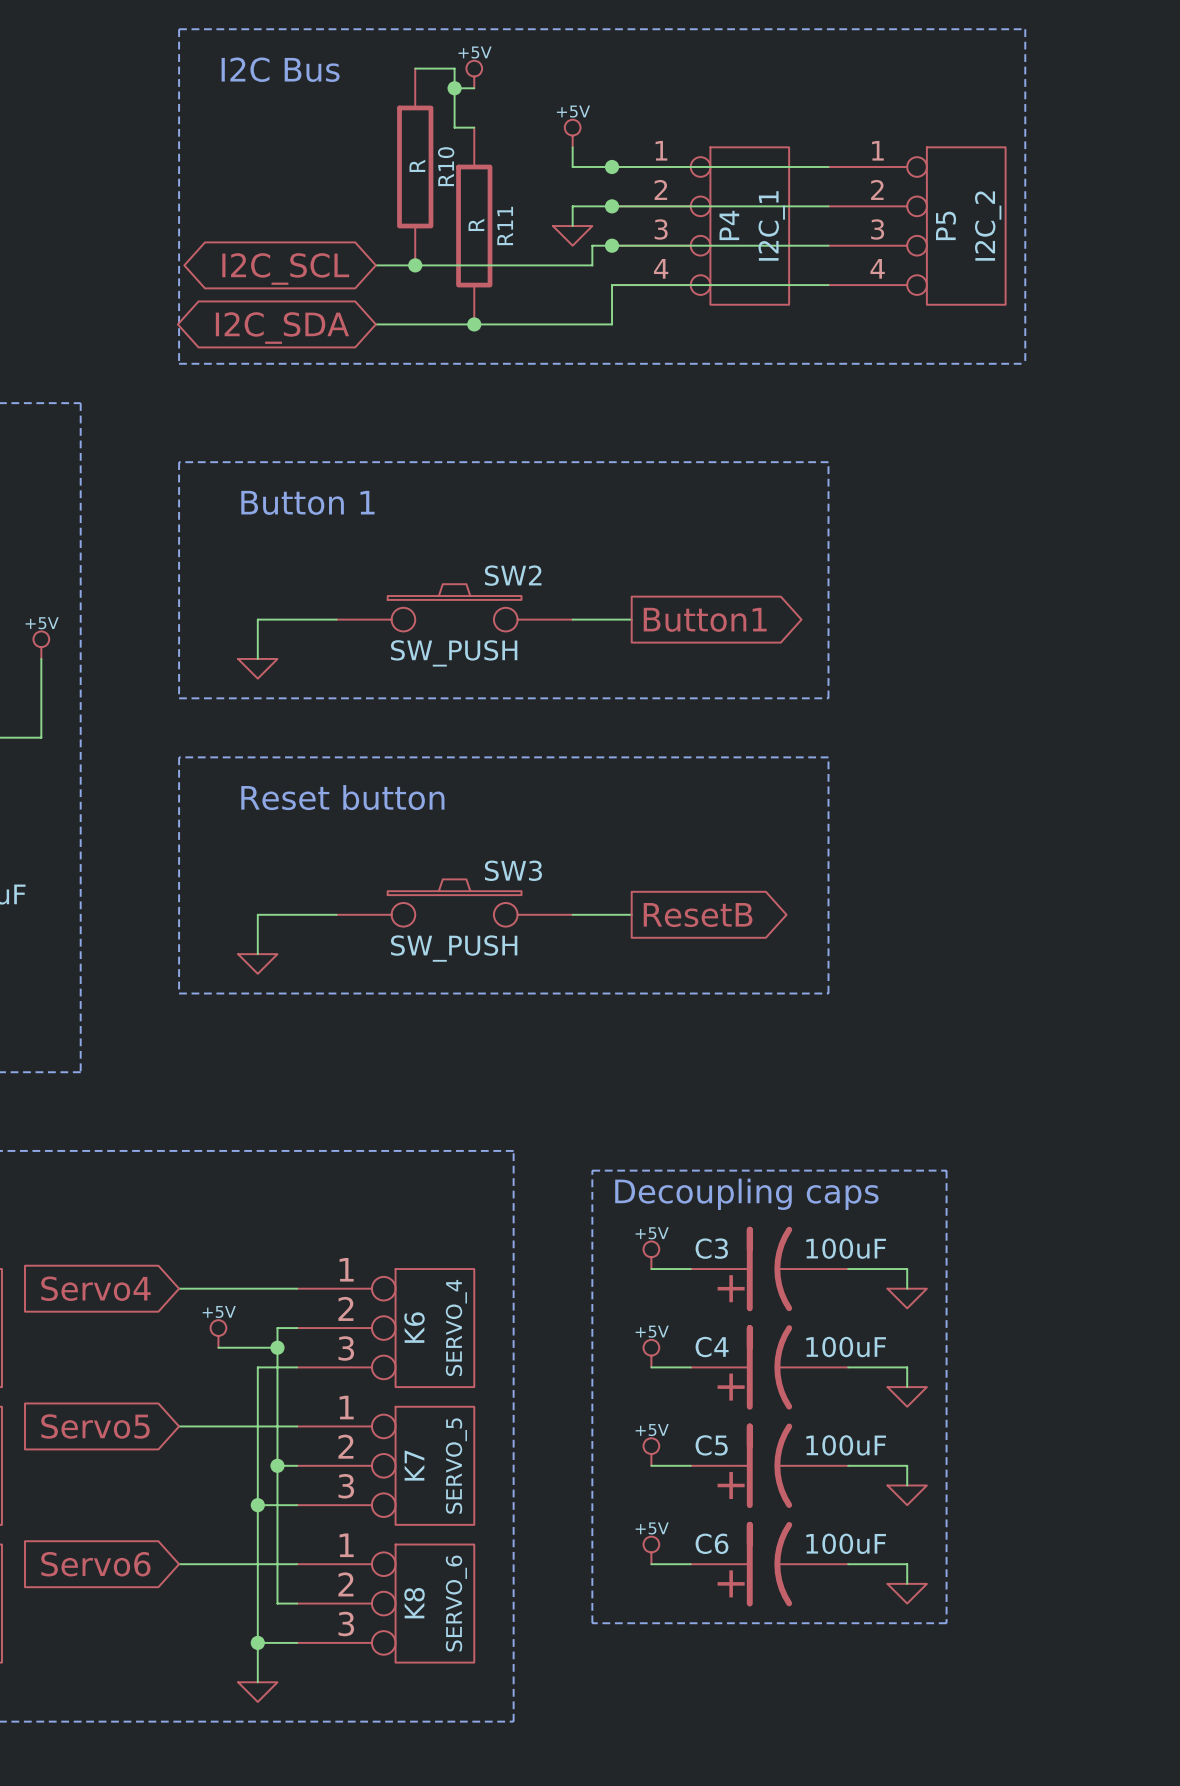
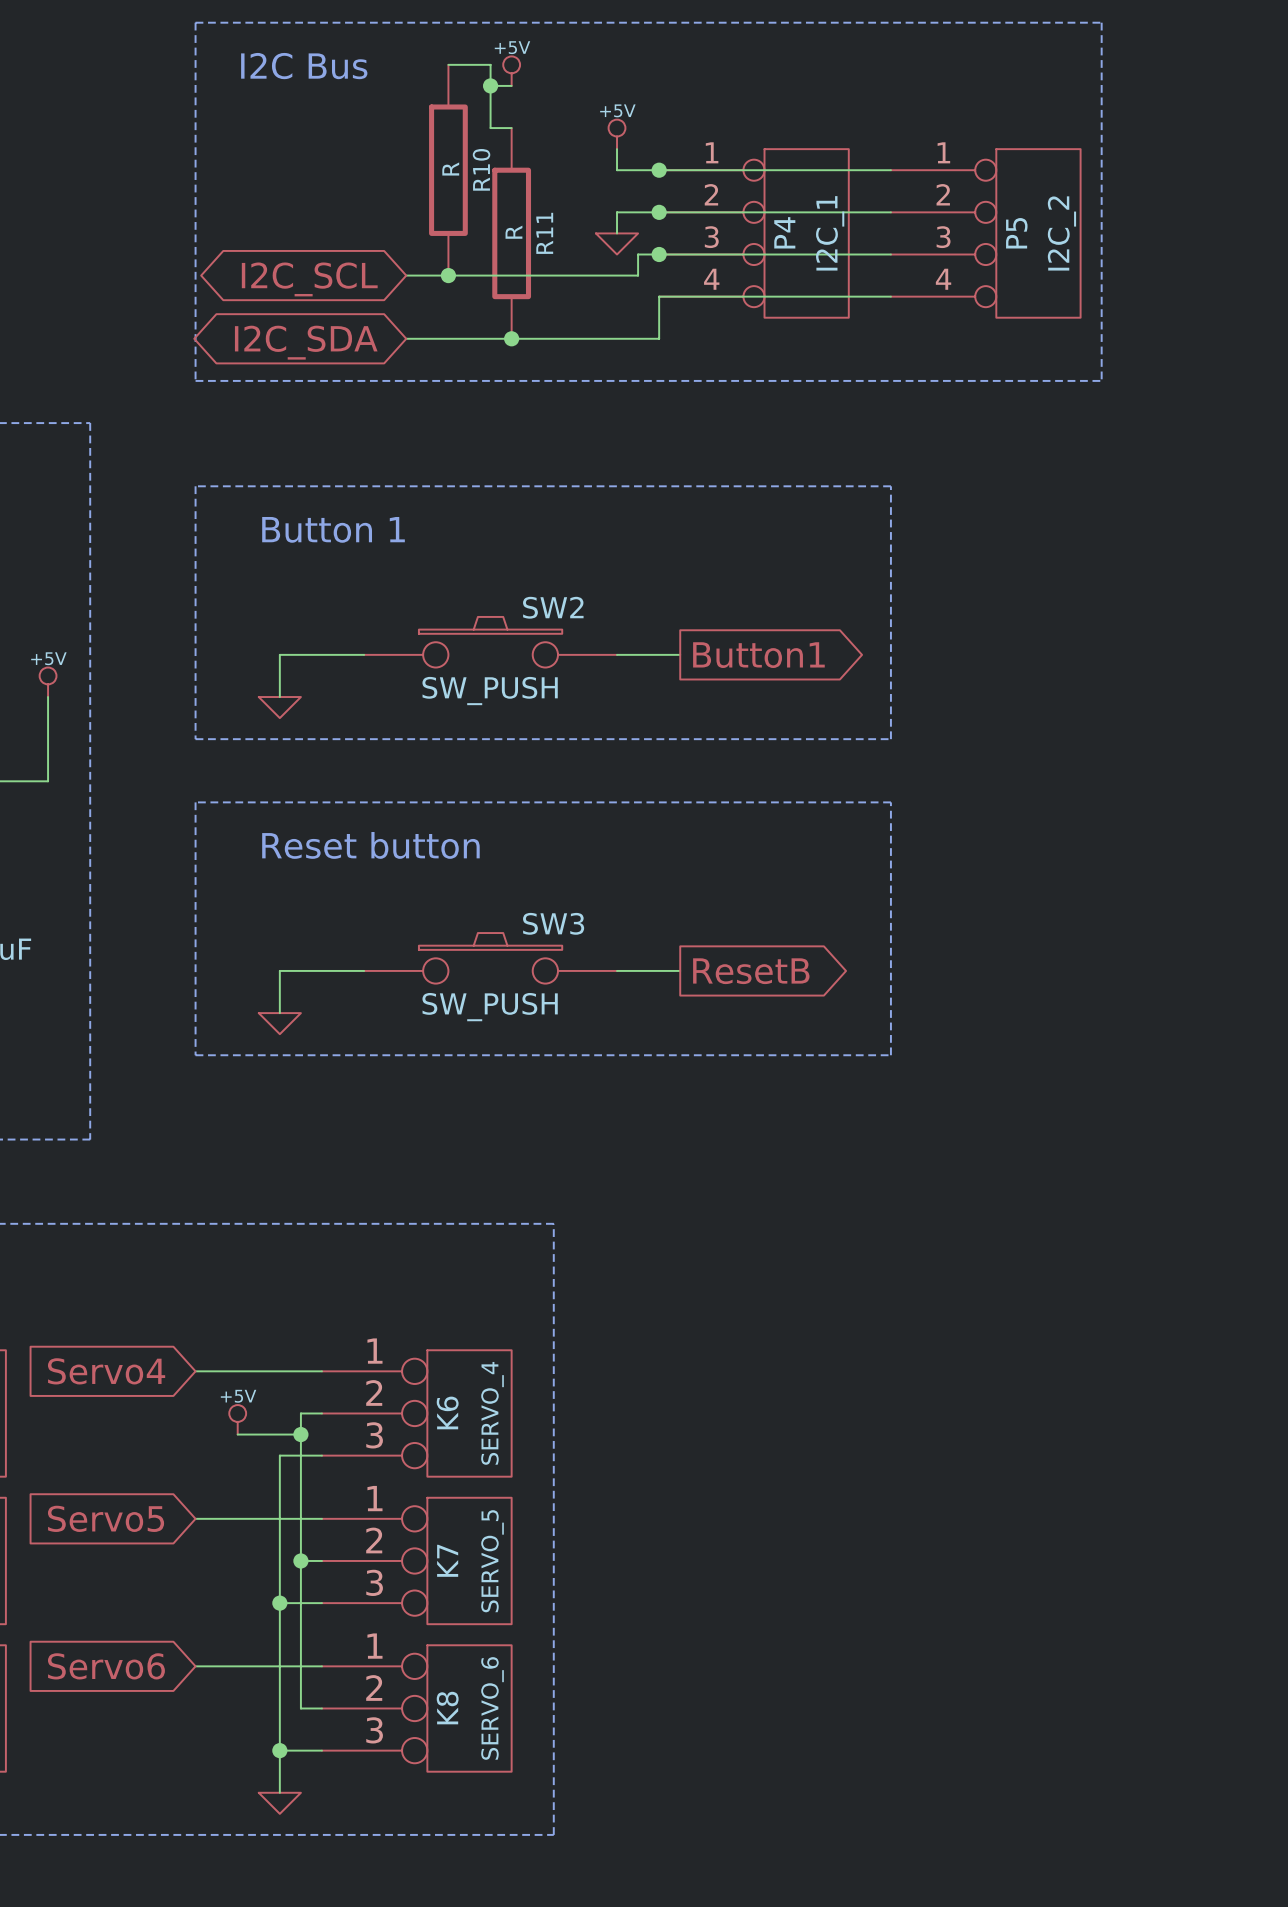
line: (592, 1170) (946, 1170) (946, 1623) (592, 1623) (592, 1170) -> none
text: Decoupling caps (746, 1194) -> none
power symbol: +5V (651, 1255) -> none
wire: (651, 1269) (690, 1269) -> none
C3: 100uF (769, 1269) -> none
wire: (848, 1269) (907, 1269) (907, 1288) -> none
power symbol: (907, 1298) -> none
power symbol: +5V (651, 1353) -> none
wire: (651, 1367) (690, 1367) -> none
C4: 100uF (769, 1367) -> none
wire: (848, 1367) (907, 1367) (907, 1387) -> none
power symbol: (907, 1396) -> none
power symbol: +5V (651, 1452) -> none
wire: (651, 1465) (690, 1465) -> none
C5: 100uF (769, 1465) -> none
wire: (848, 1465) (907, 1465) (907, 1485) -> none
power symbol: (907, 1495) -> none
power symbol: +5V (651, 1550) -> none
wire: (651, 1564) (690, 1564) -> none
C6: 100uF (769, 1564) -> none
wire: (848, 1564) (907, 1564) (907, 1583) -> none
power symbol: (907, 1593) -> none

